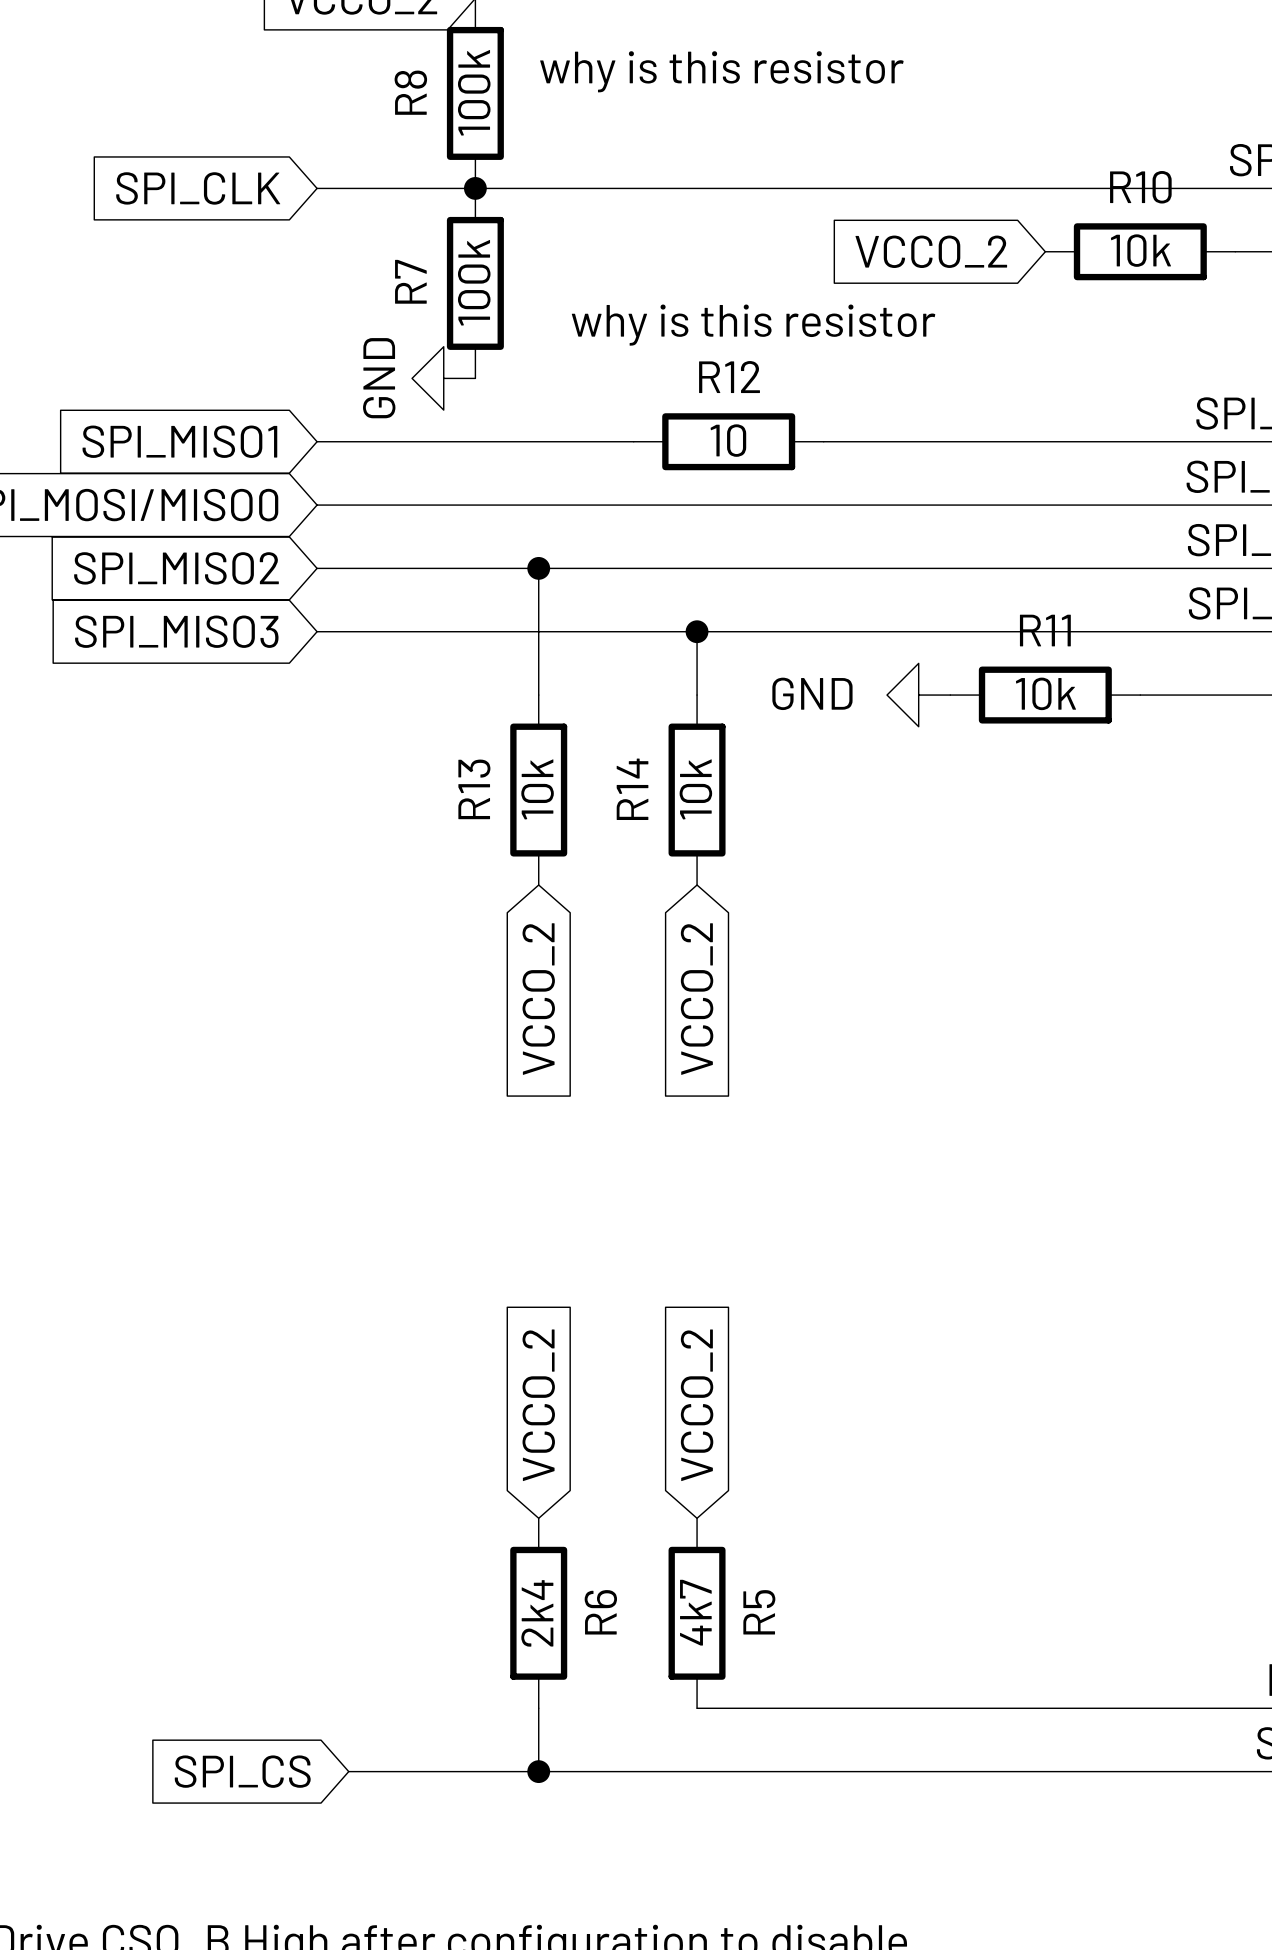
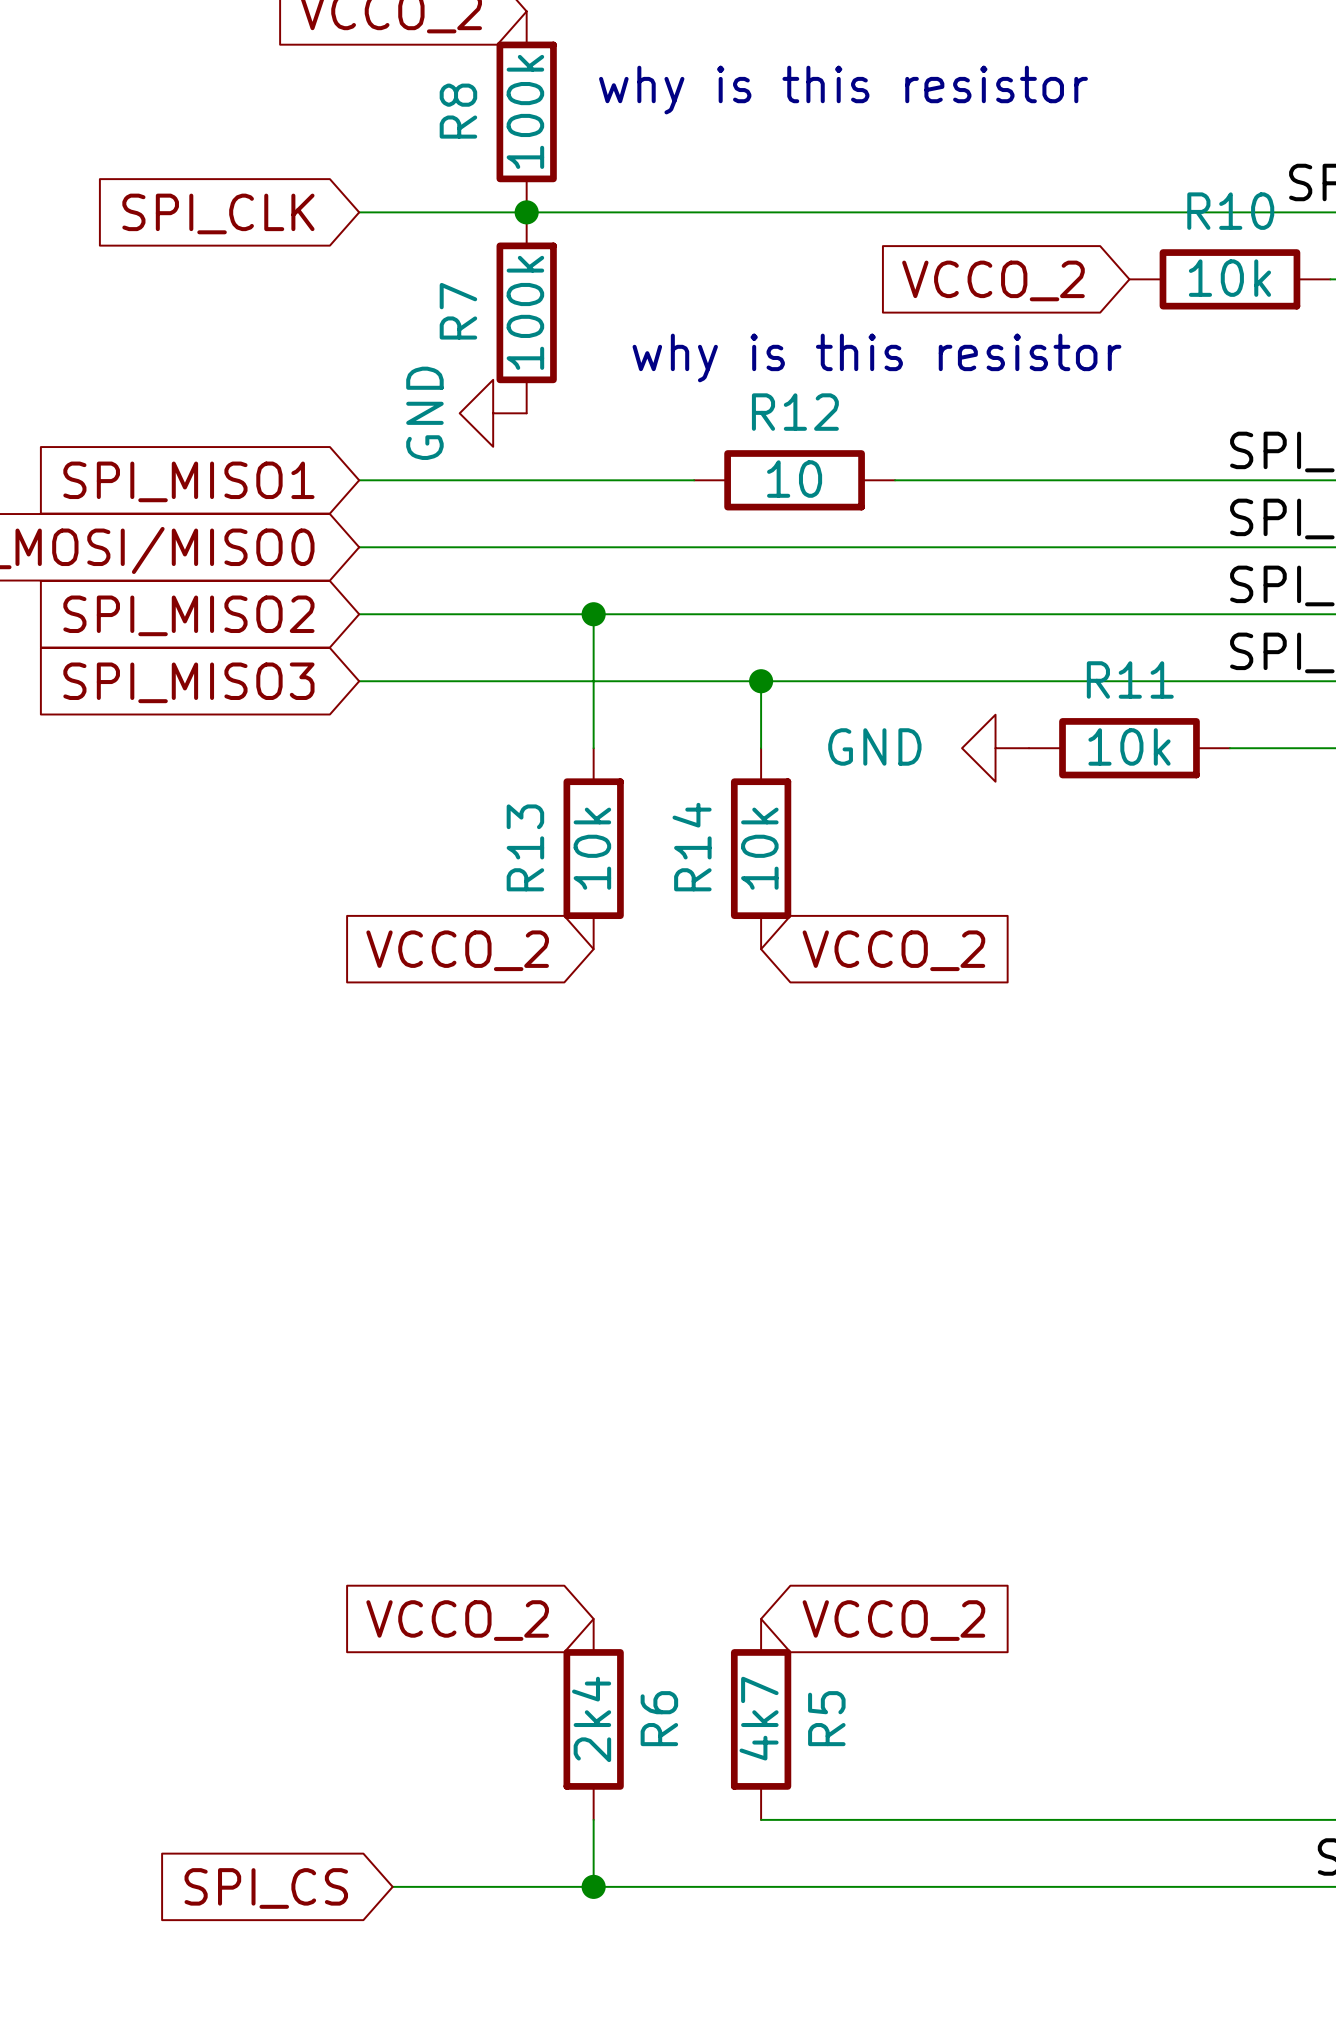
global label rotation: 0° (538, 999) -> 90° clockwise (457, 950)
global label rotation: 0° (697, 999) -> 90° counterclockwise (893, 950)
global label rotation: 0° (538, 1405) -> 90° counterclockwise (457, 1620)
global label rotation: 0° (697, 1405) -> 90° clockwise (893, 1620)

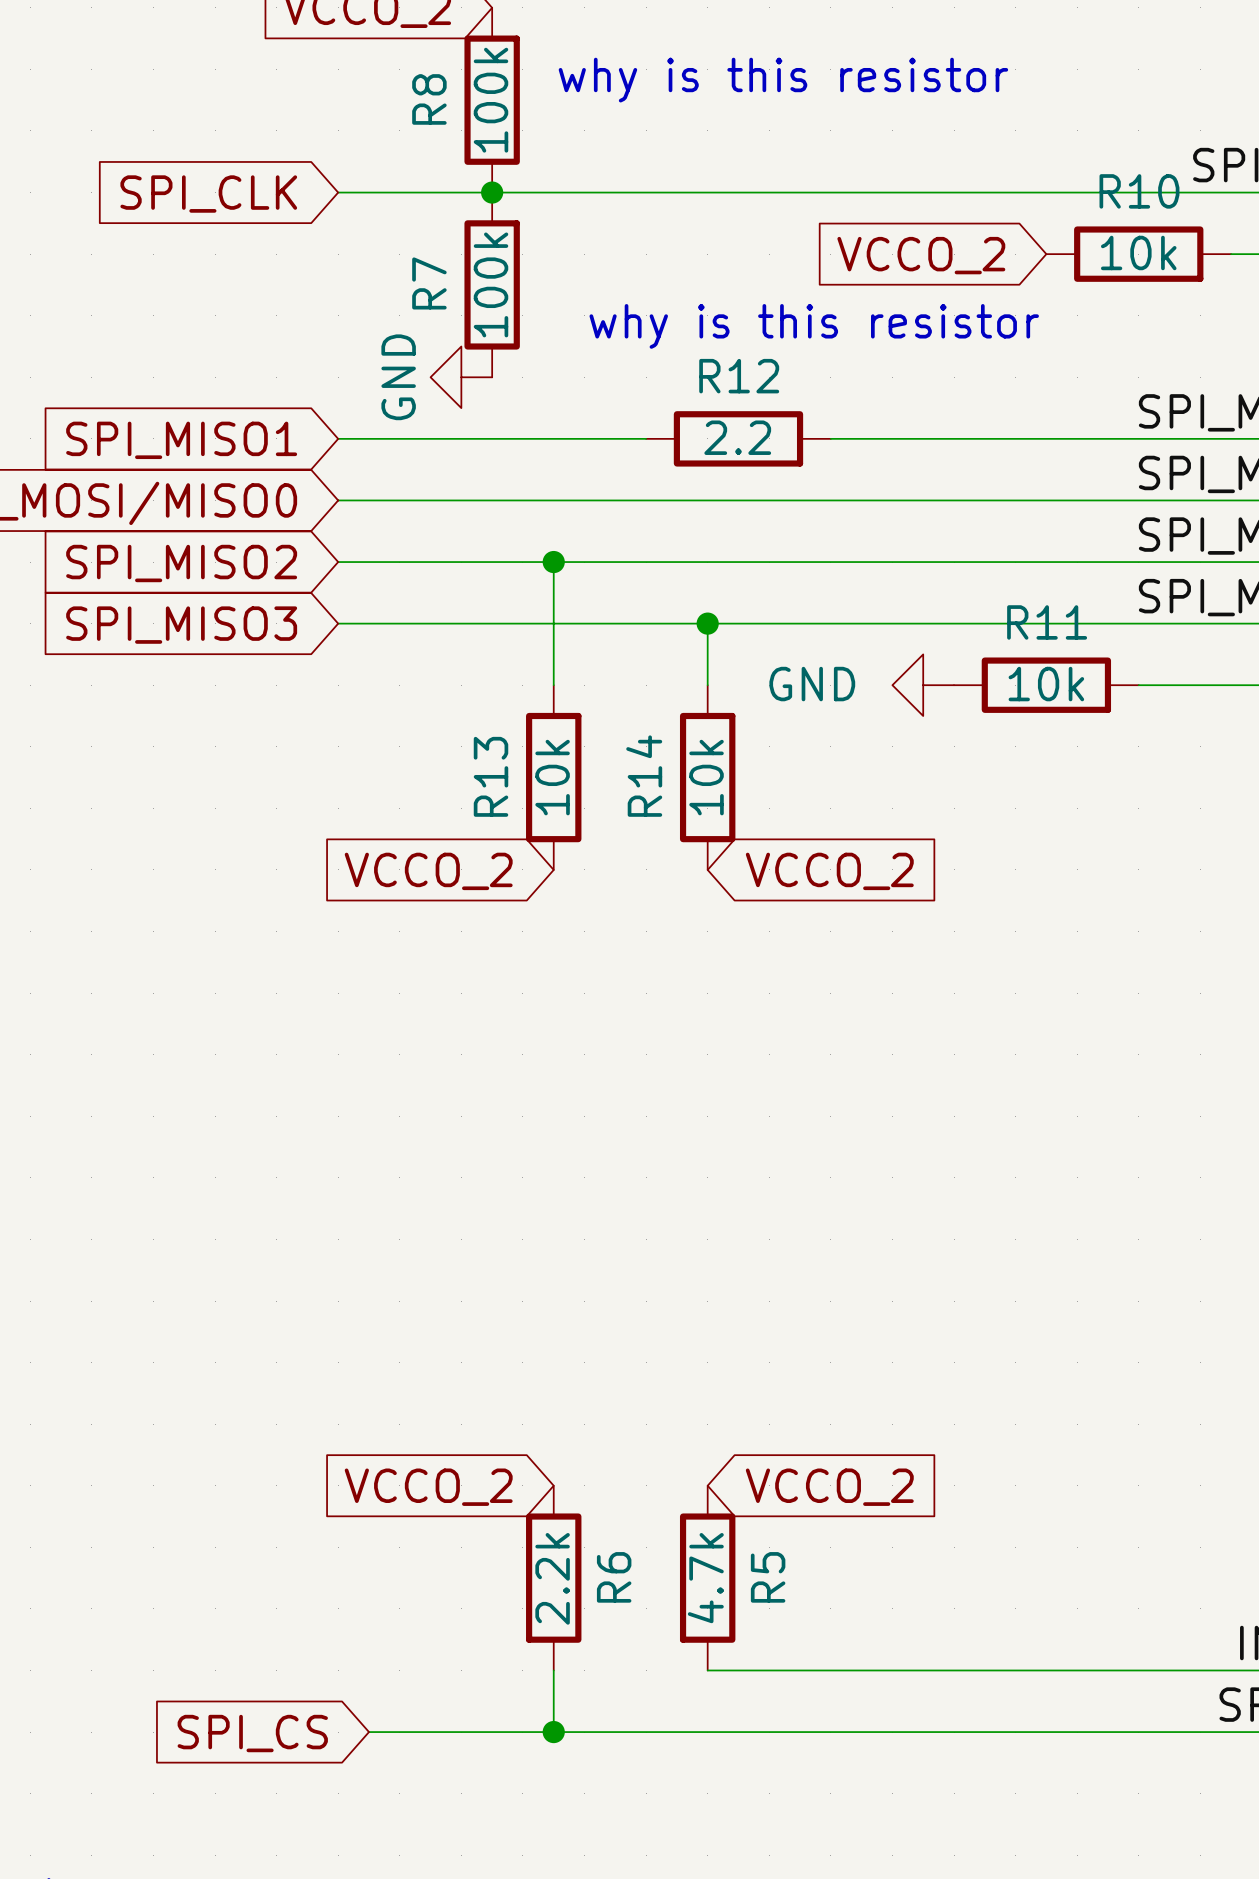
R12 value: 10 (794, 479) -> 2.2 (737, 437)
R5 value: 4k7 (759, 1718) -> 4.7k (705, 1578)
R6 value: 2k4 (591, 1719) -> 2.2k (552, 1578)

